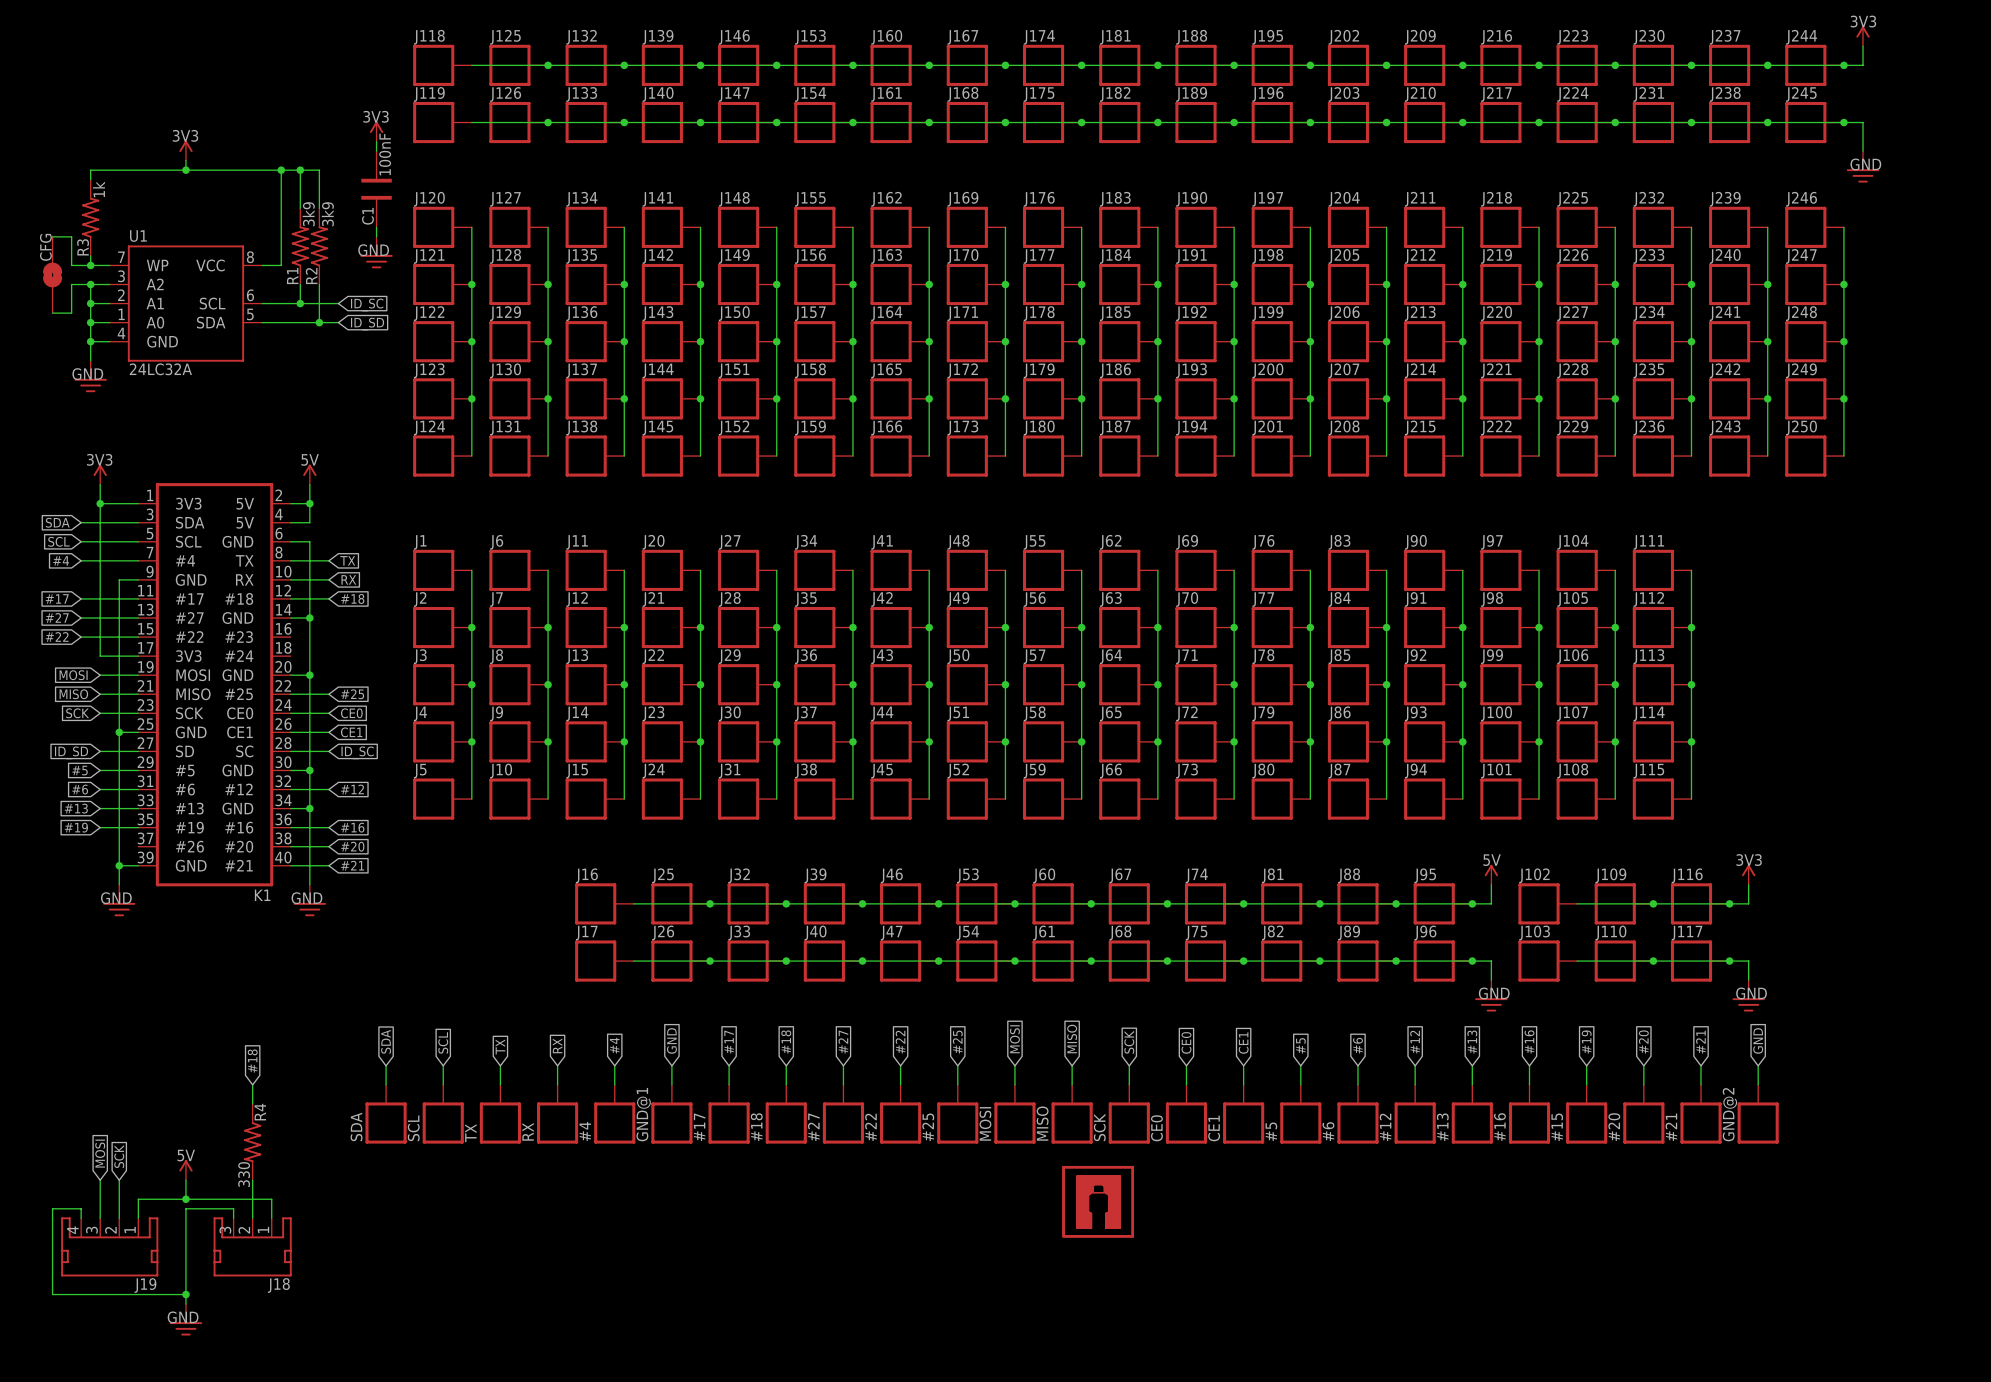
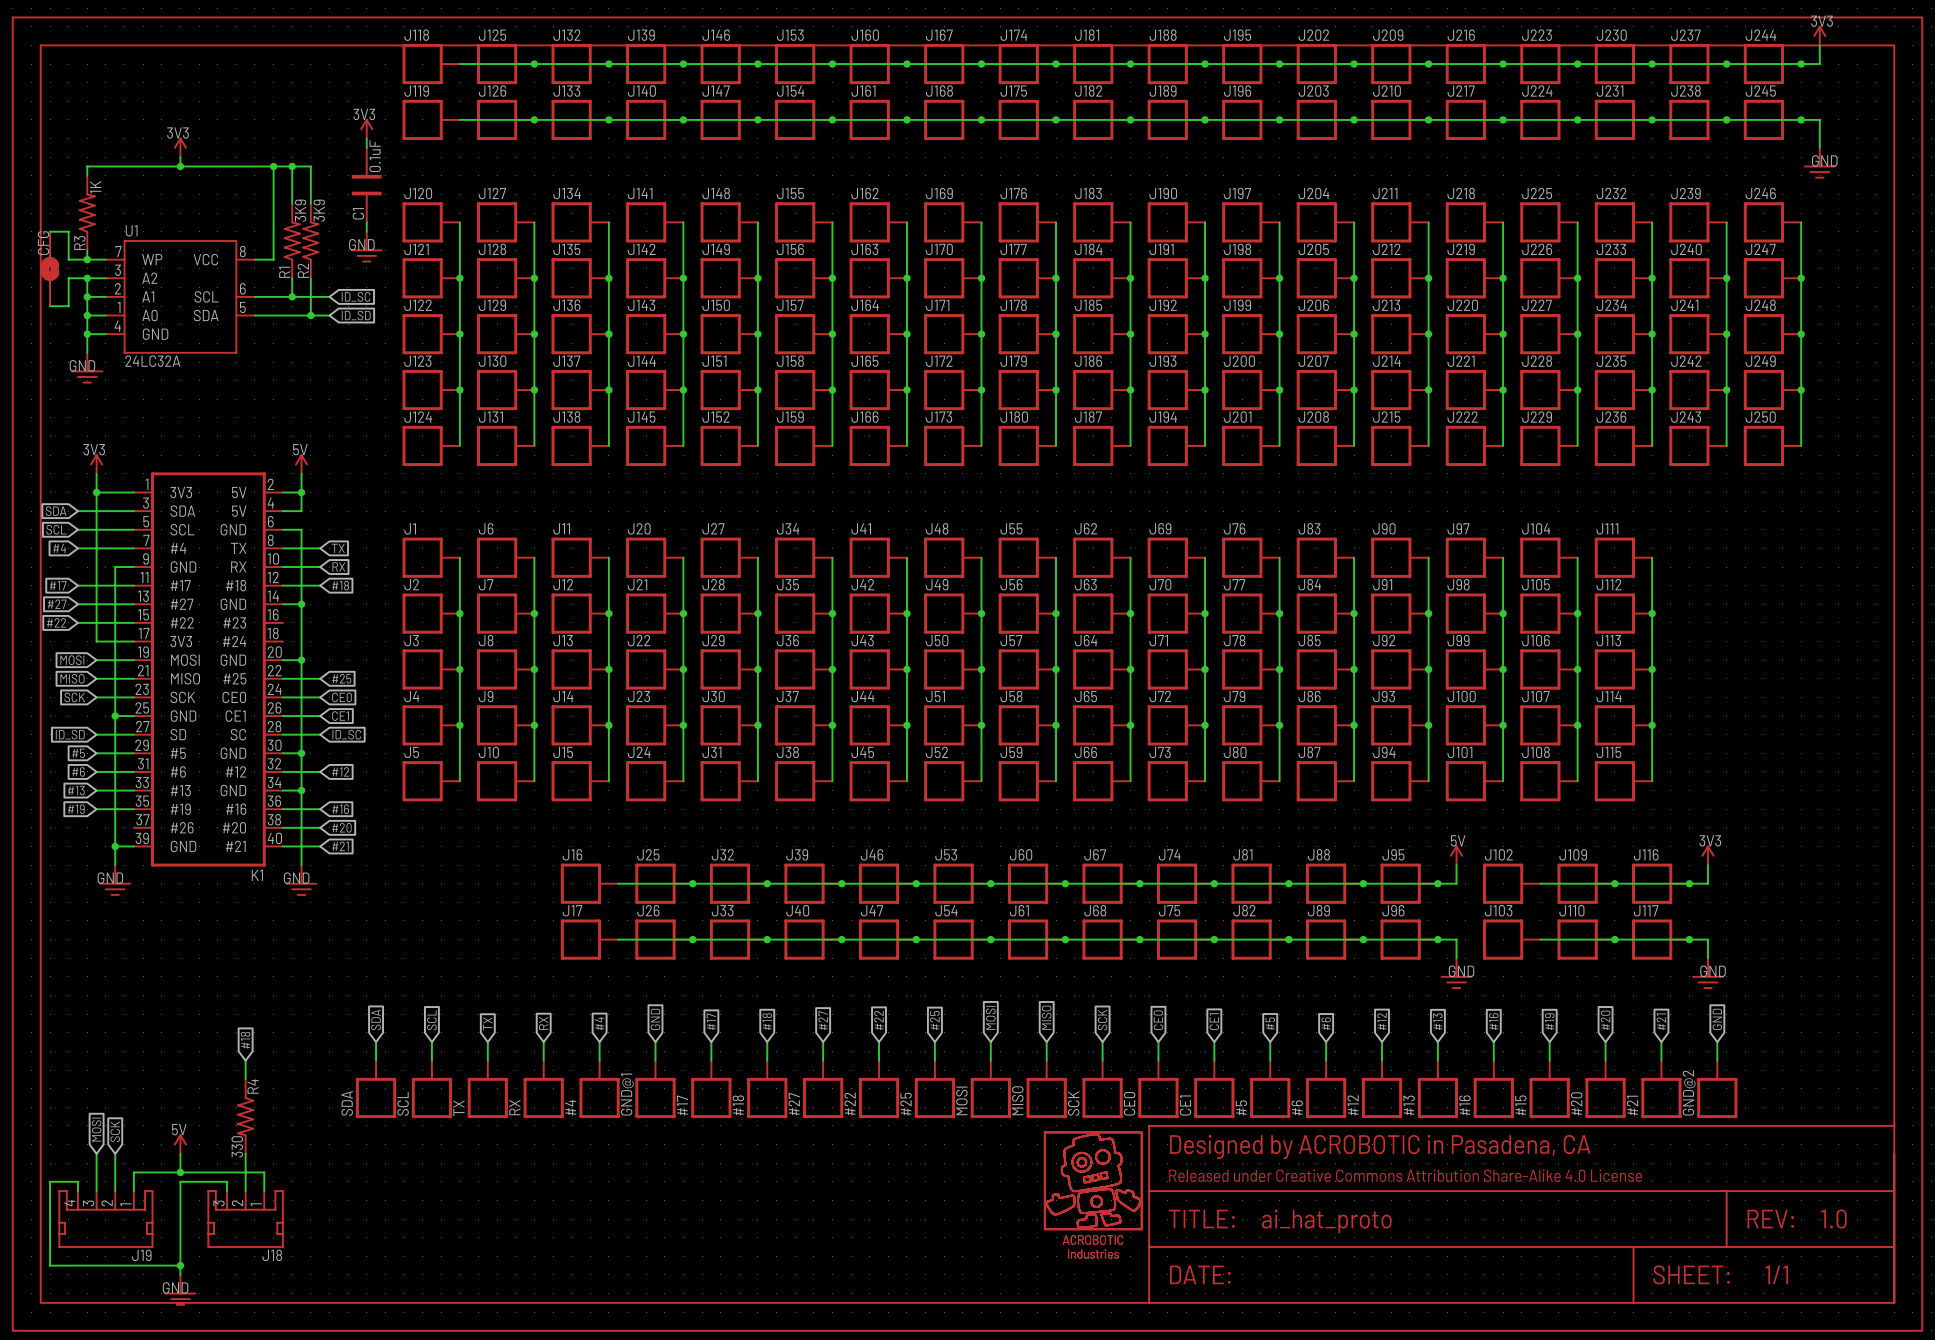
C1 value: 100nF (385, 154) -> 0.1uF (375, 156)
R3 value: 1k (99, 189) -> 1K (95, 187)
R1 value: 3k9 (308, 214) -> 3K9 (300, 210)
R2 value: 3k9 (327, 214) -> 3K9 (319, 210)
part: none -> (967, 674)
part: (1098, 1201) -> none
part: none -> (1093, 1180)
part: none -> (1521, 1214)

